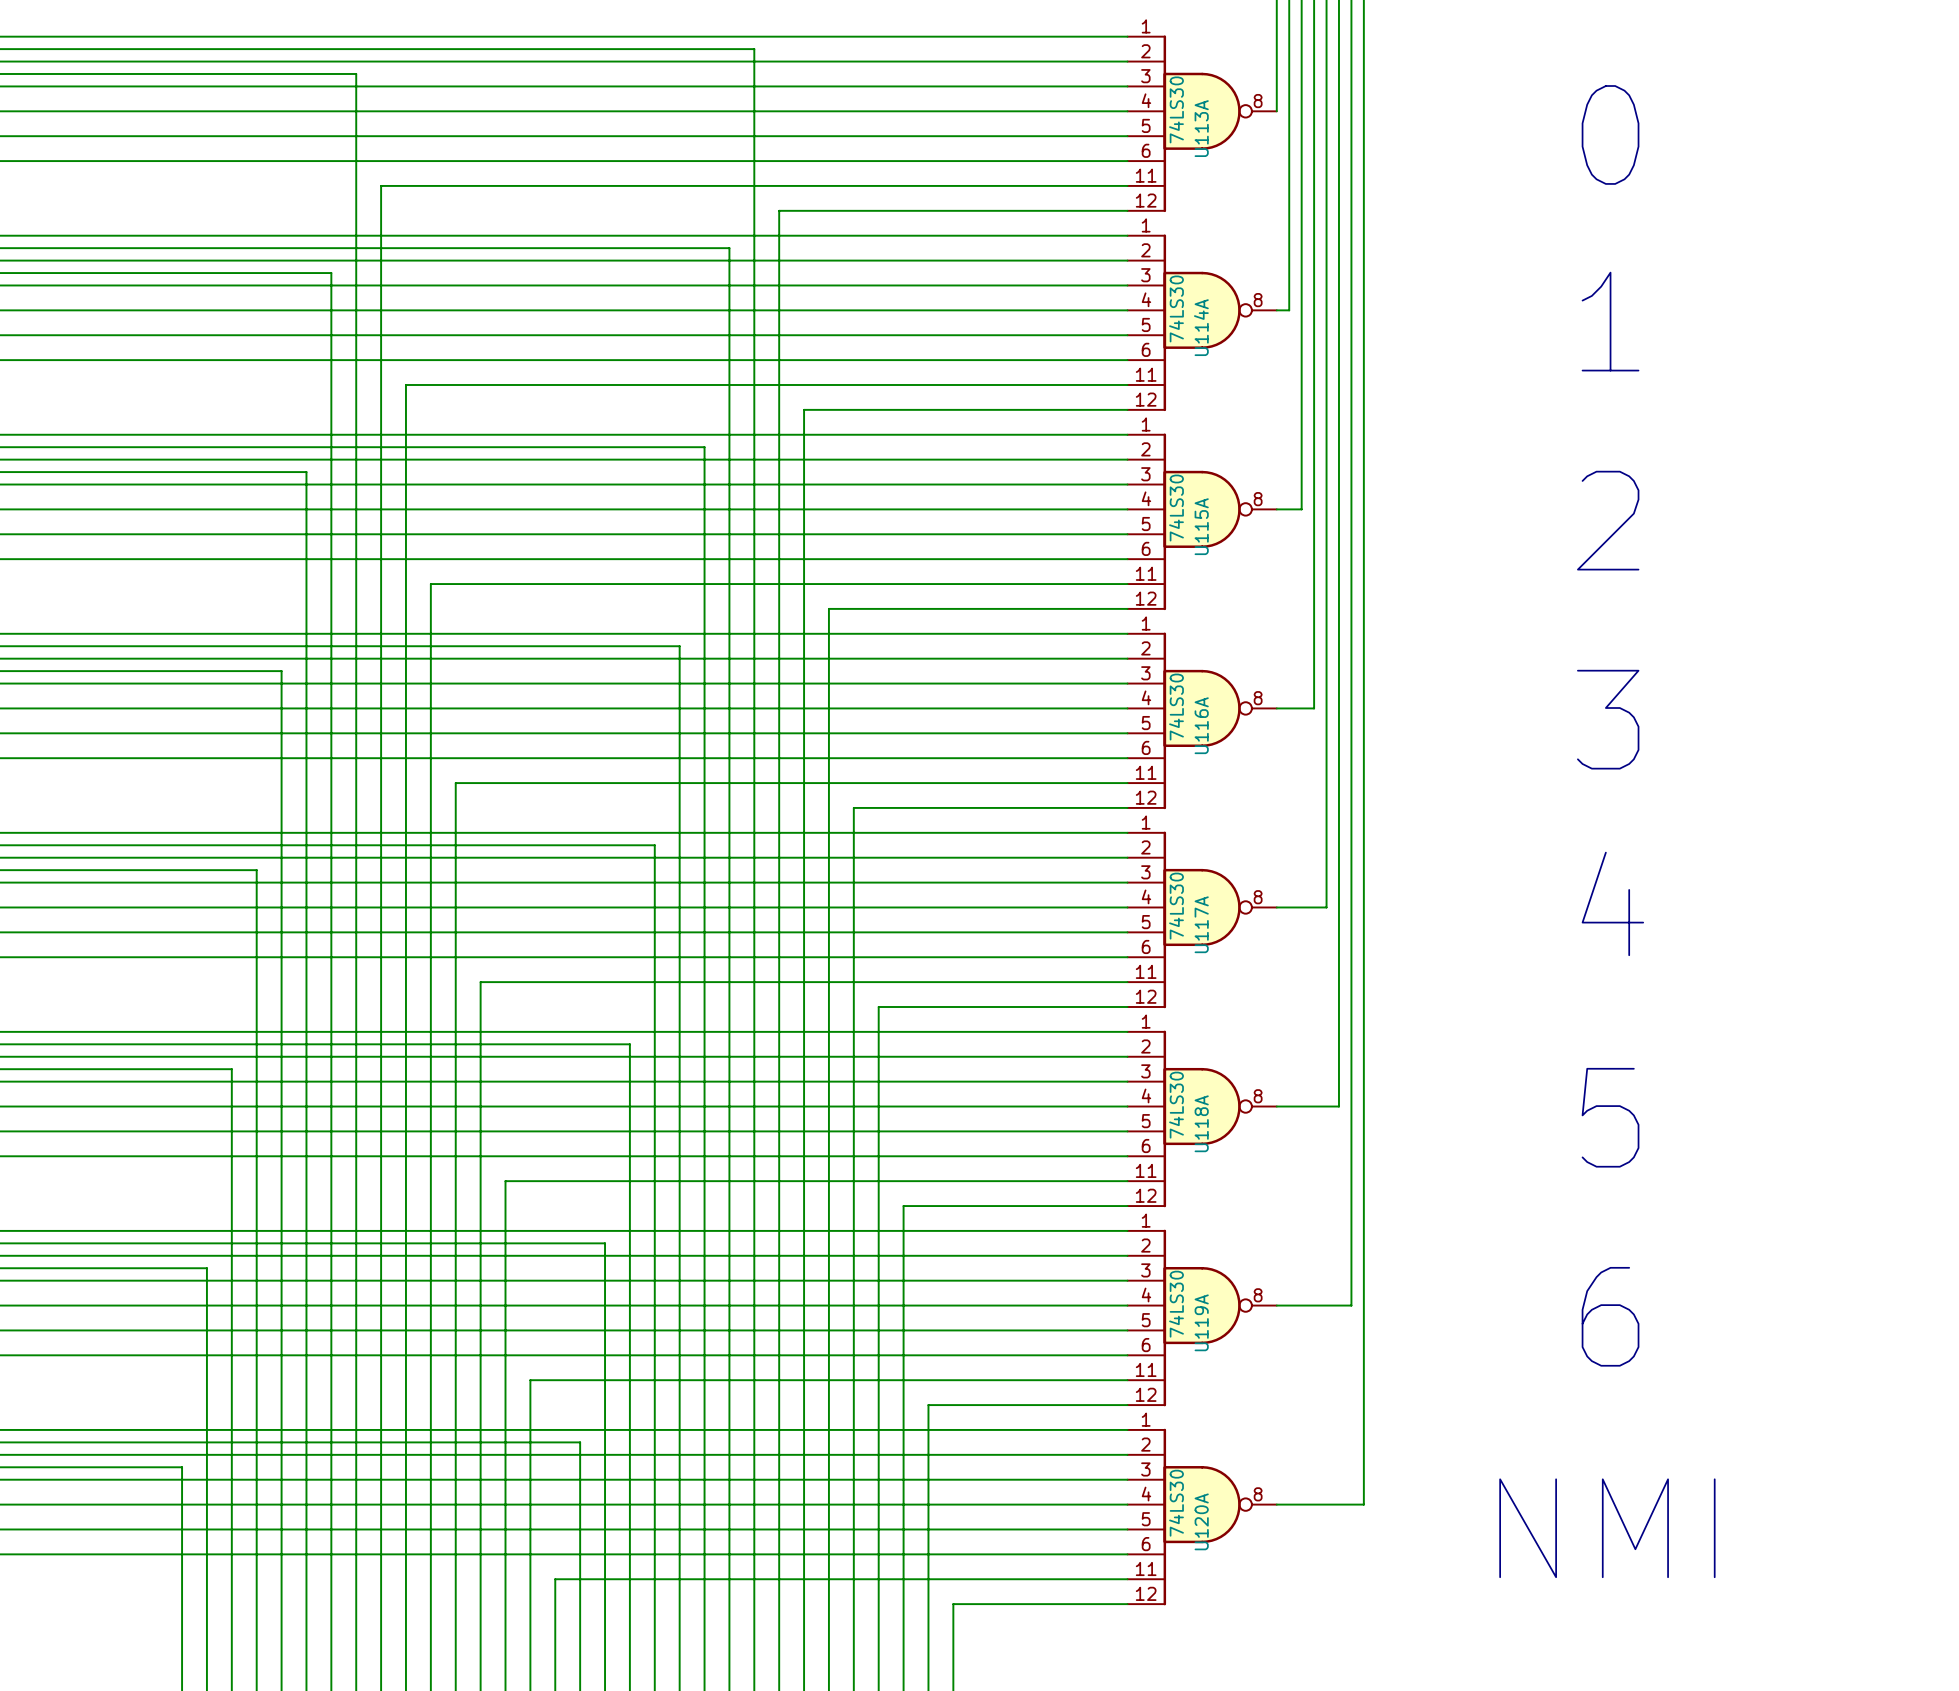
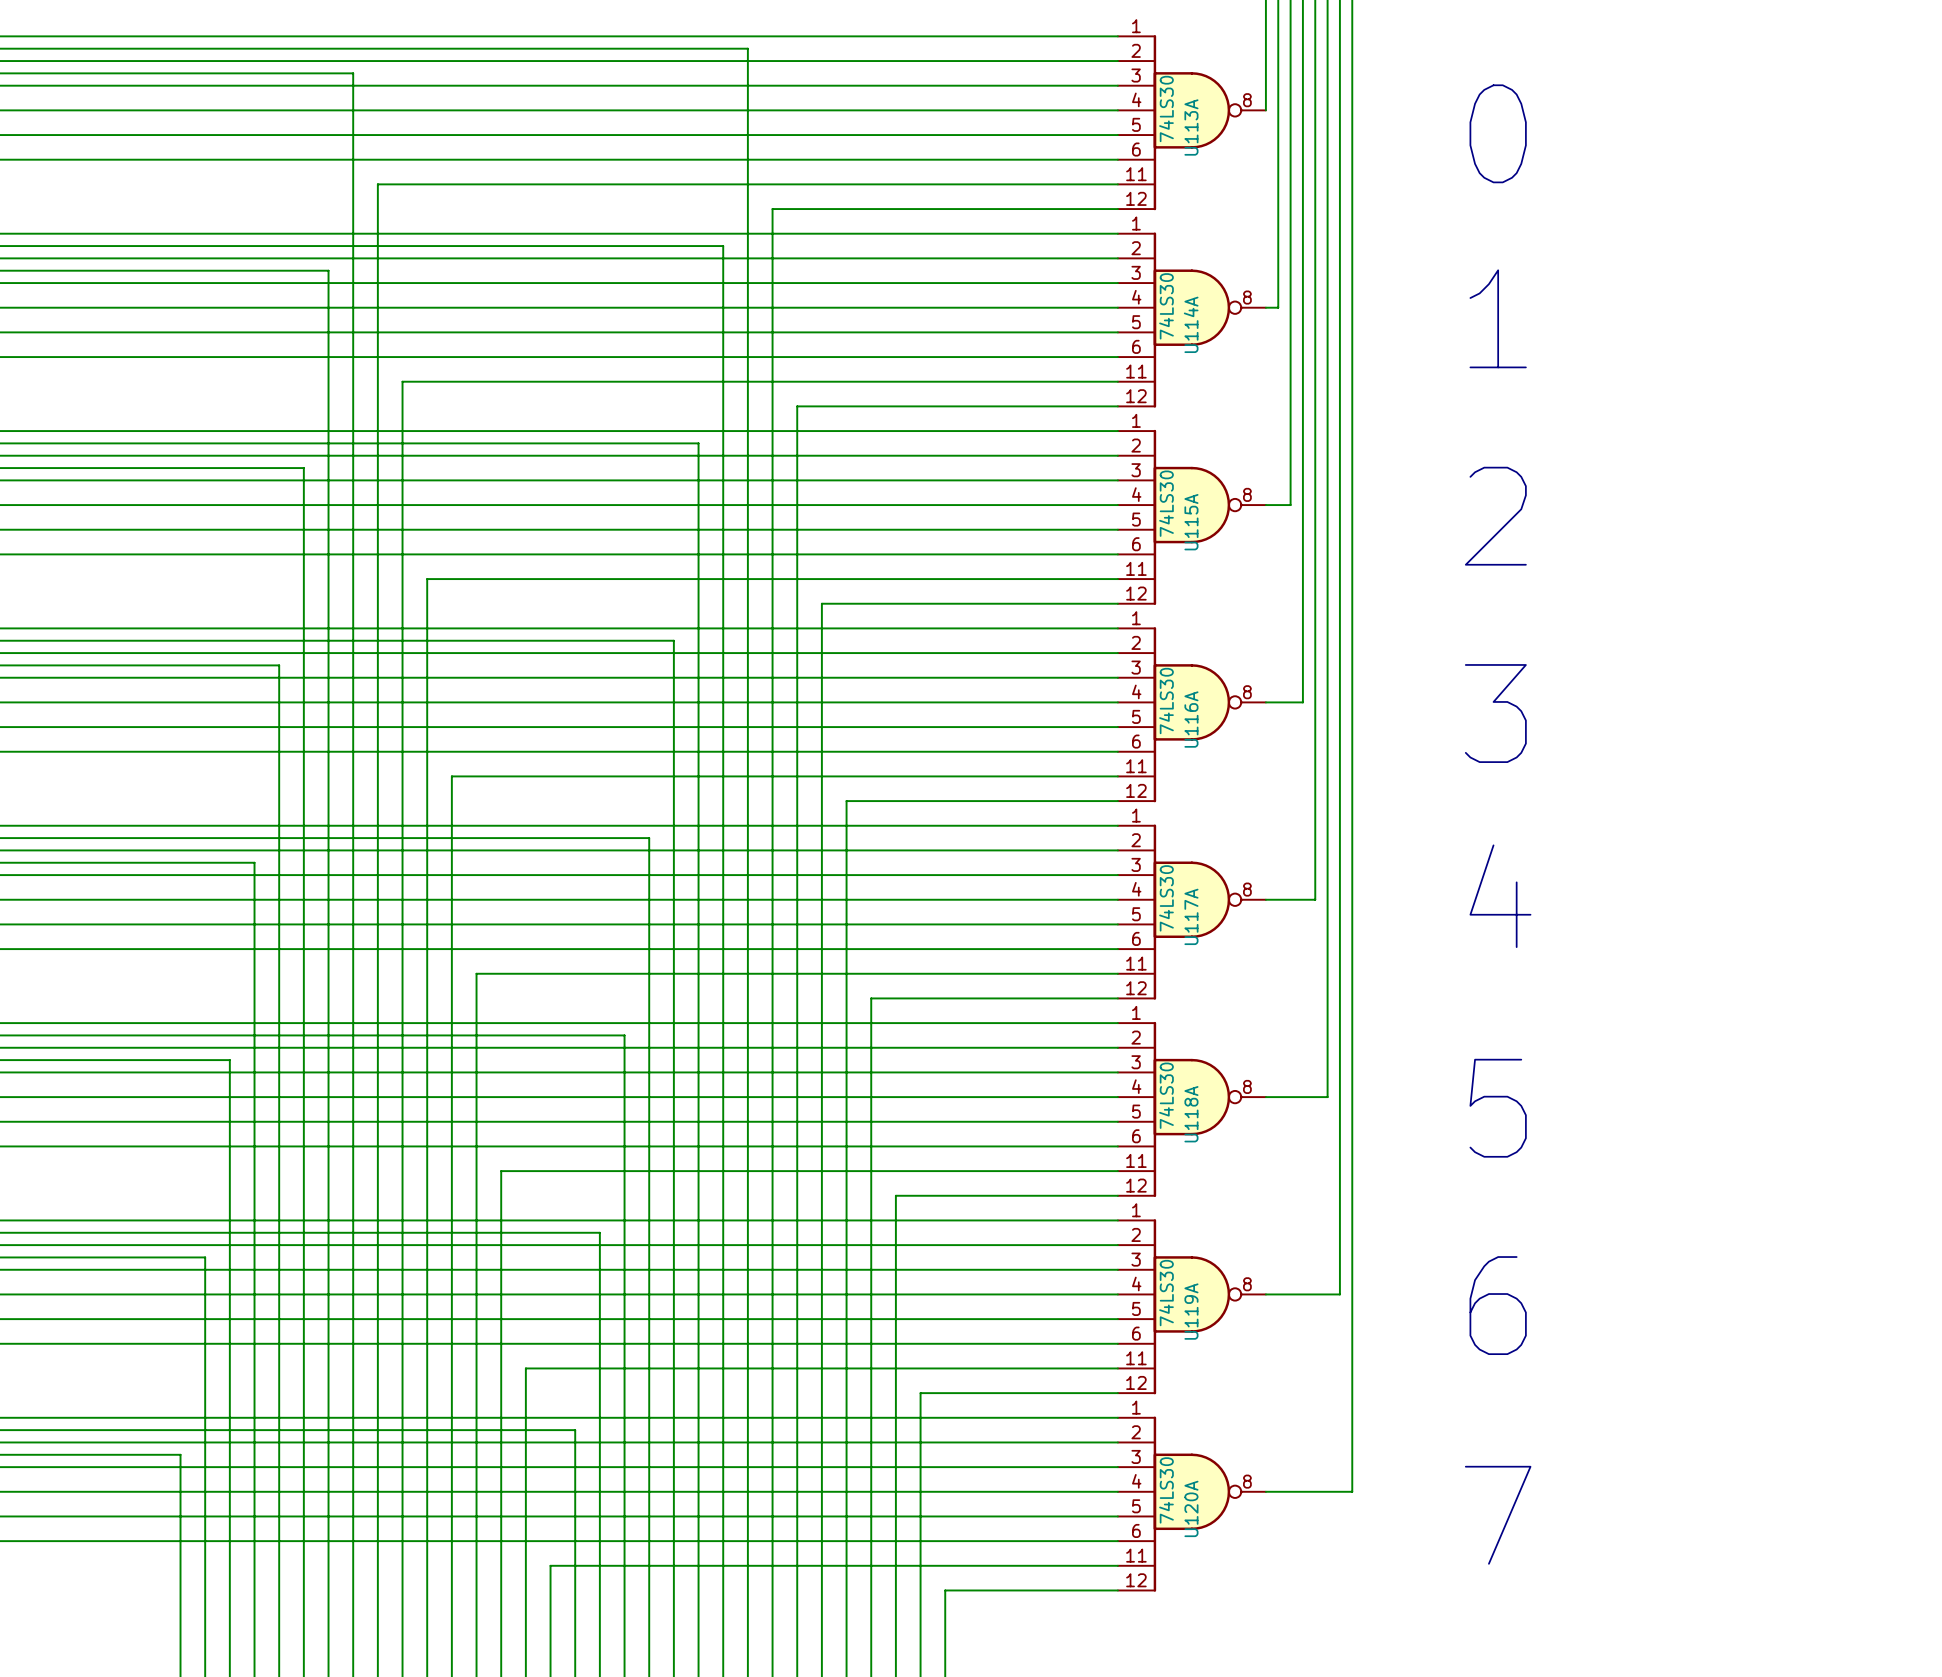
text position: 0 (1610, 134) -> 0 (1498, 133)
text position: 1 (1610, 321) -> 1 (1498, 318)
text position: 2 (1608, 520) -> 2 (1495, 516)
text position: 3 (1608, 719) -> 3 (1495, 713)
text position: 4 (1612, 903) -> 4 (1500, 896)
text position: 5 (1610, 1117) -> 5 (1498, 1108)
text position: 6 (1610, 1316) -> 6 (1498, 1305)
text: none -> 7 (1498, 1515)
text: NMI (1607, 1528) -> none

